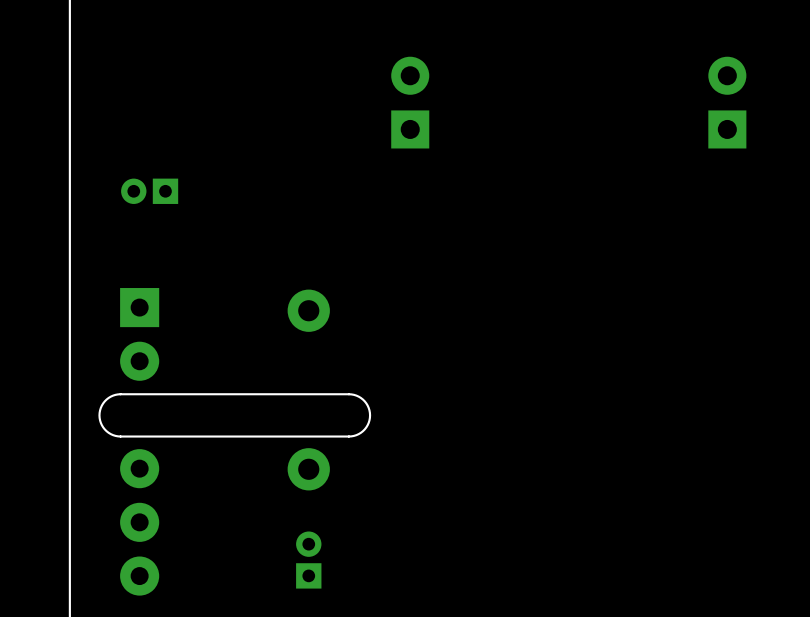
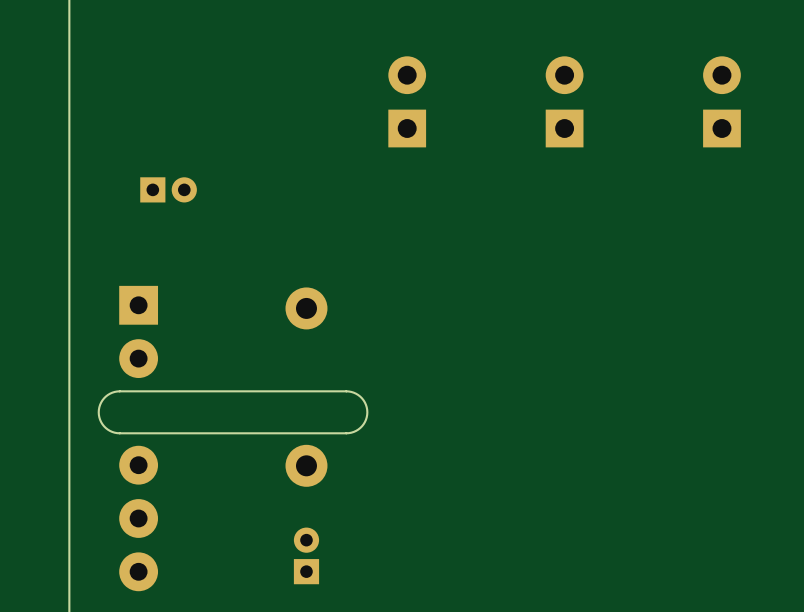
part: none -> (564, 101)
part rotation: 0° (149, 191) -> 180° (168, 189)

